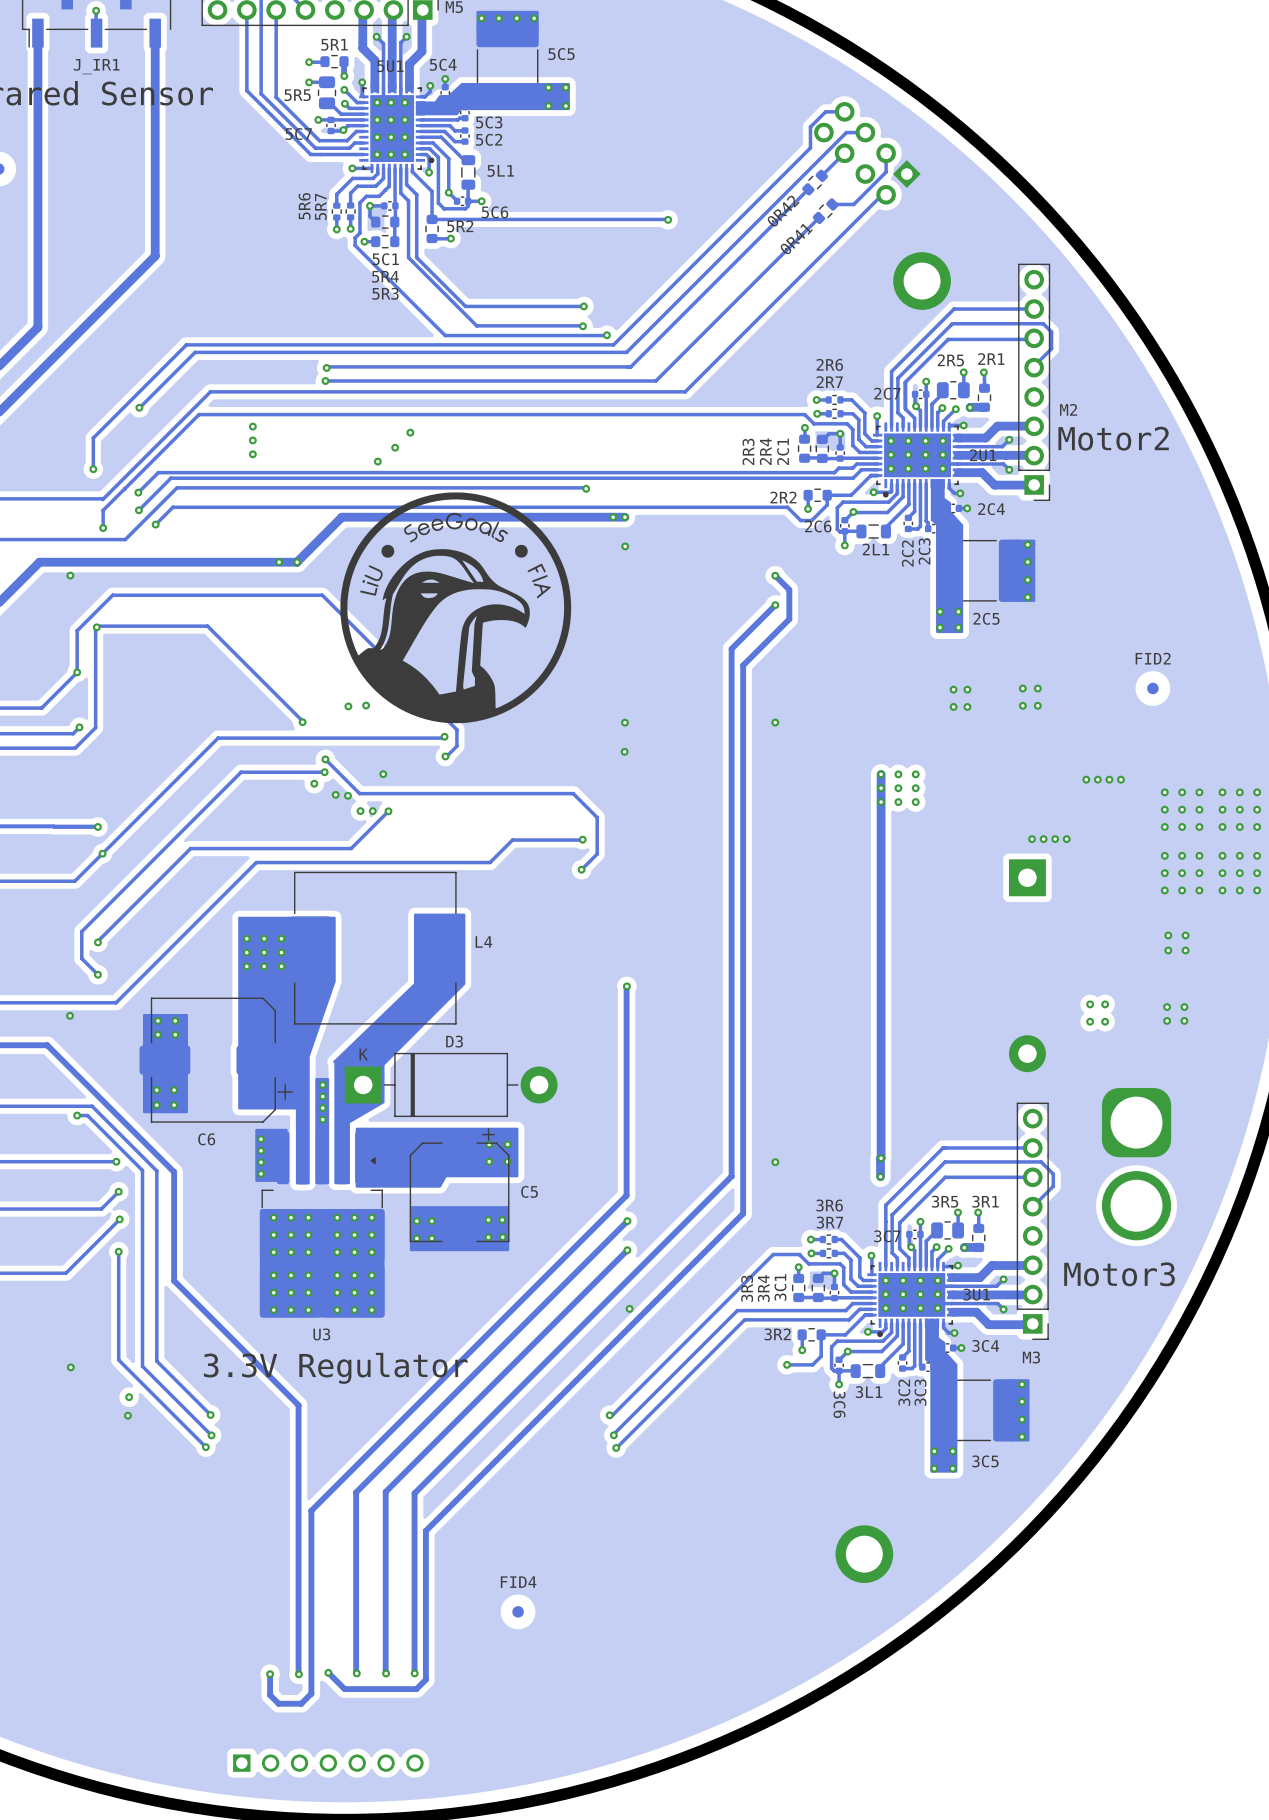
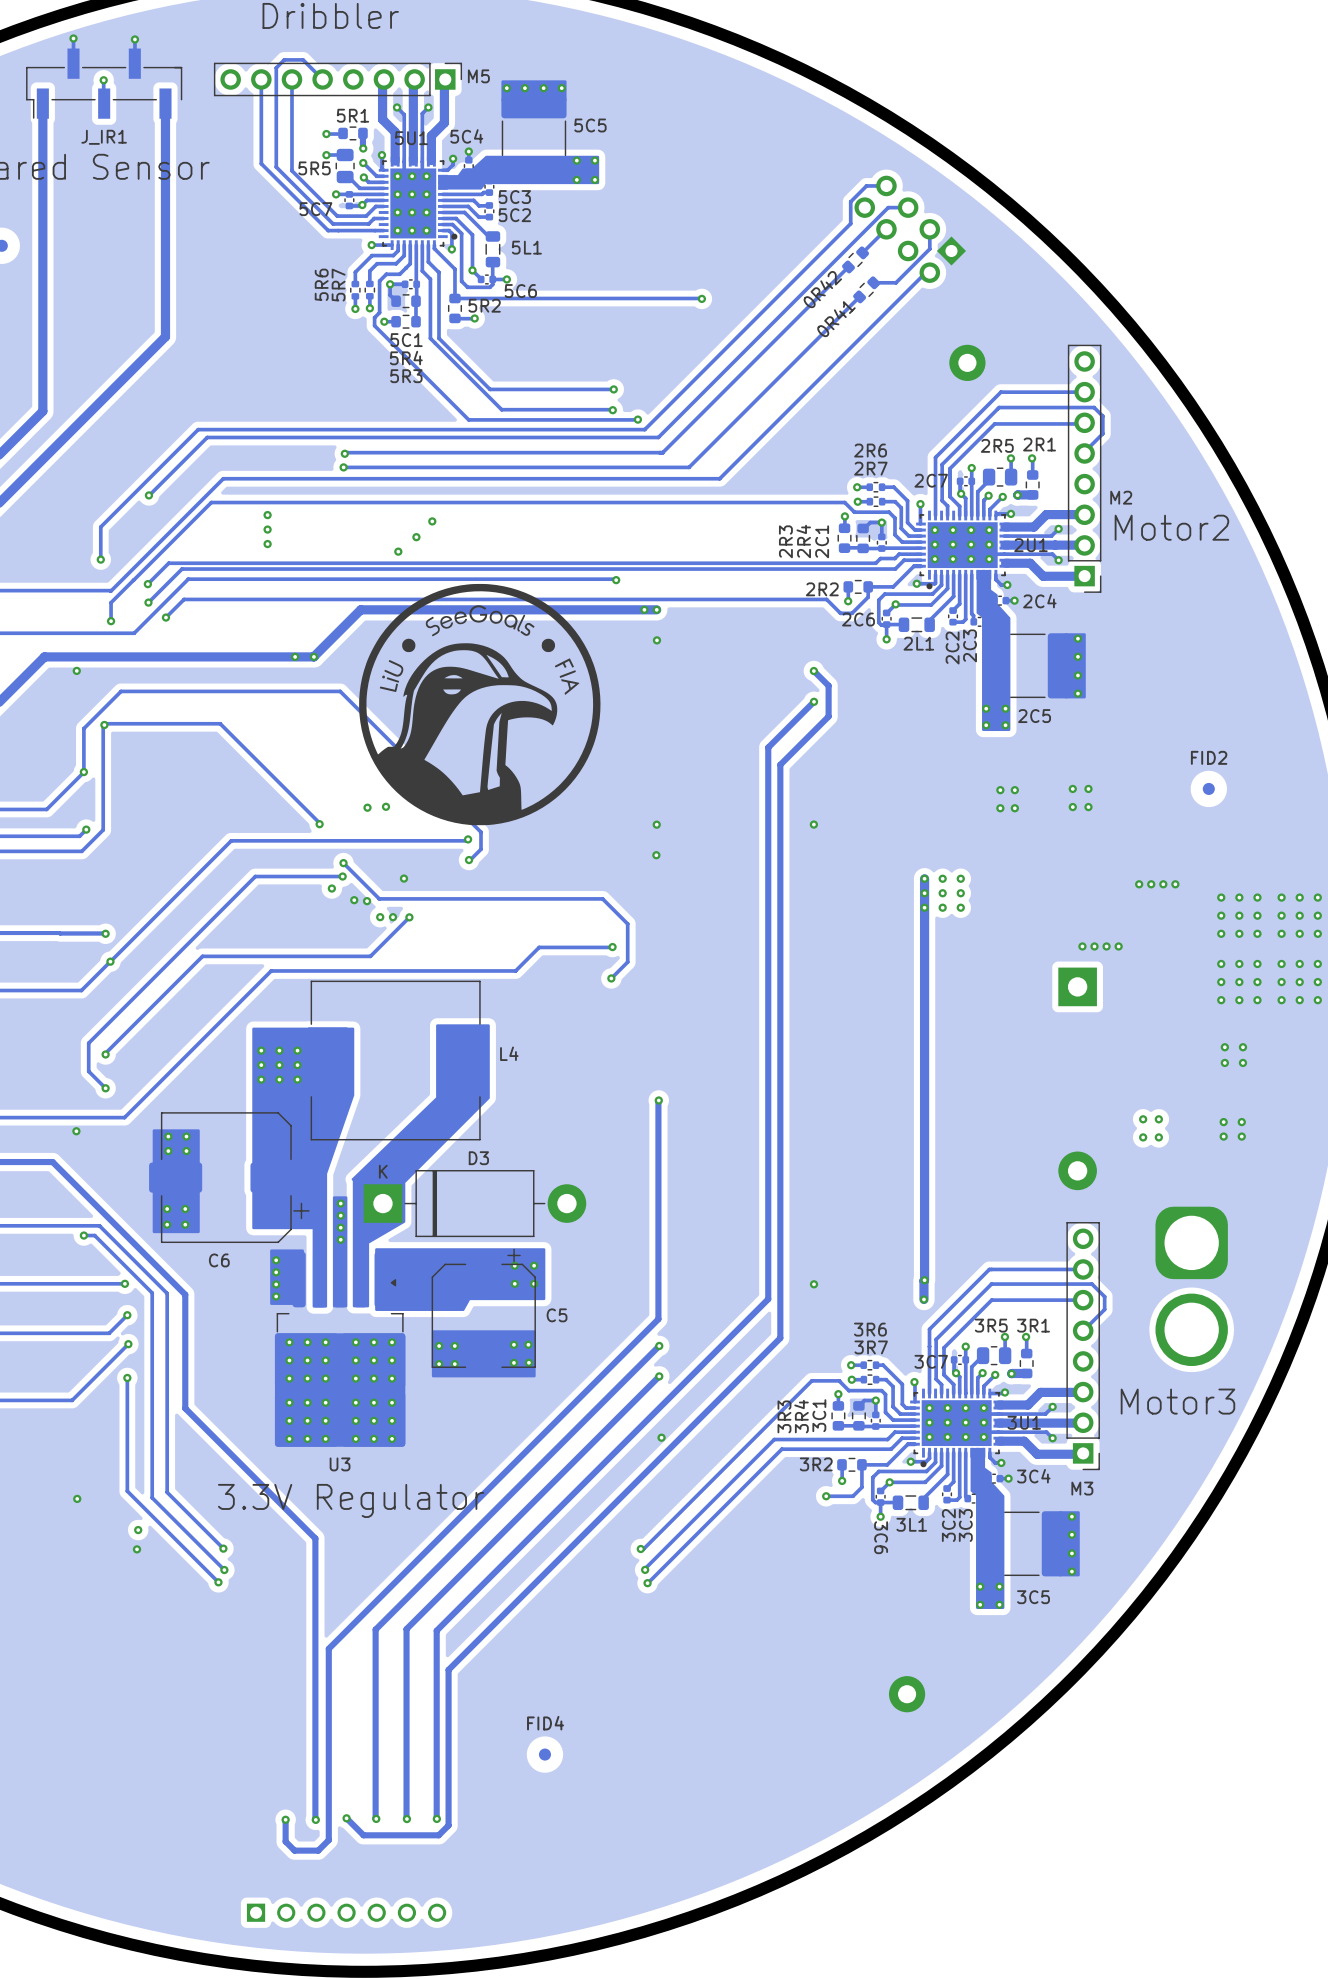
part footprint: [893, 252, 951, 310] -> [949, 344, 986, 381]
part footprint: [835, 1525, 894, 1584] -> [888, 1676, 926, 1713]

